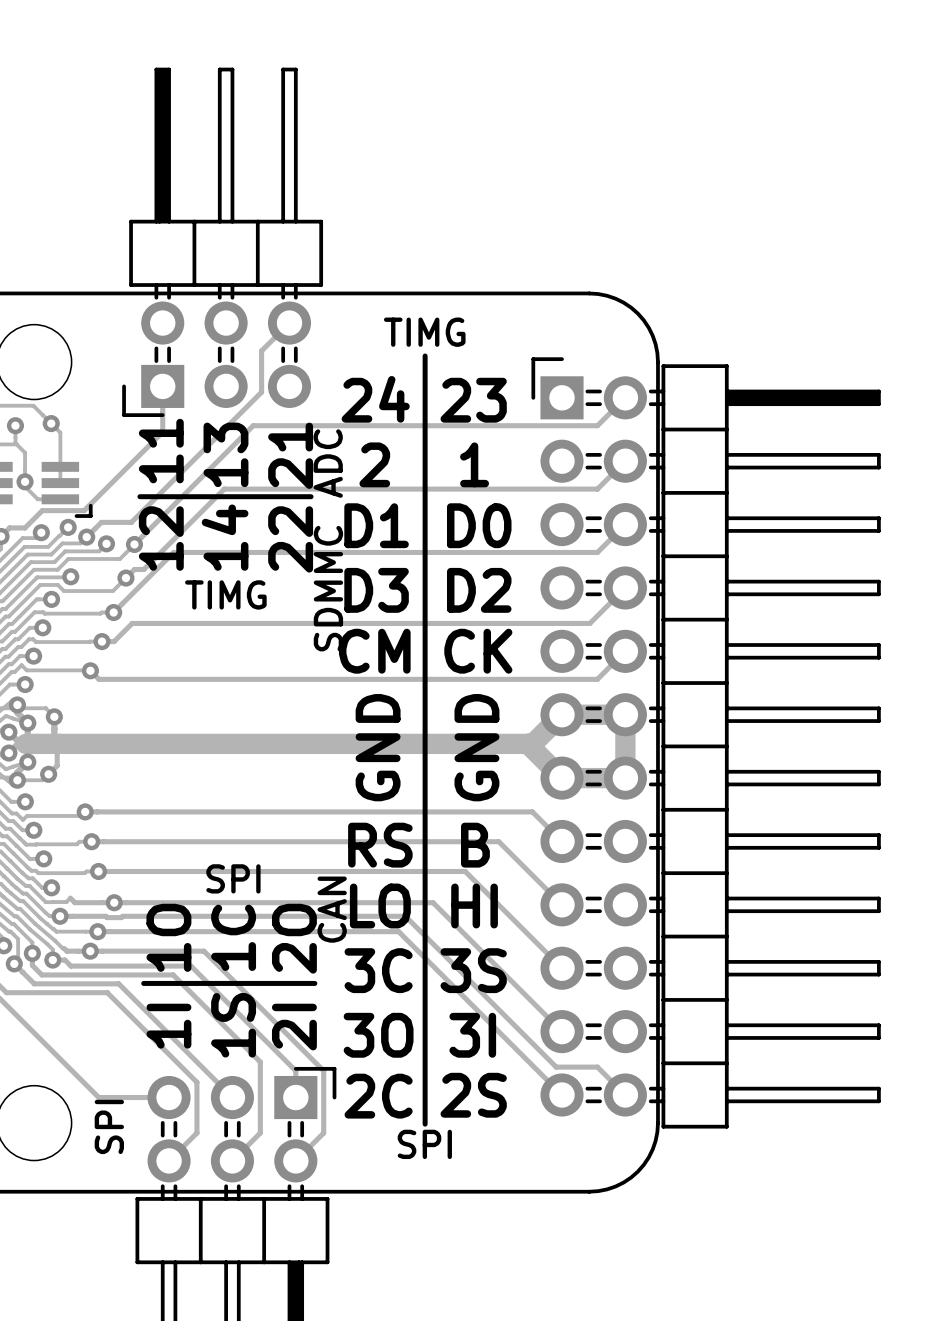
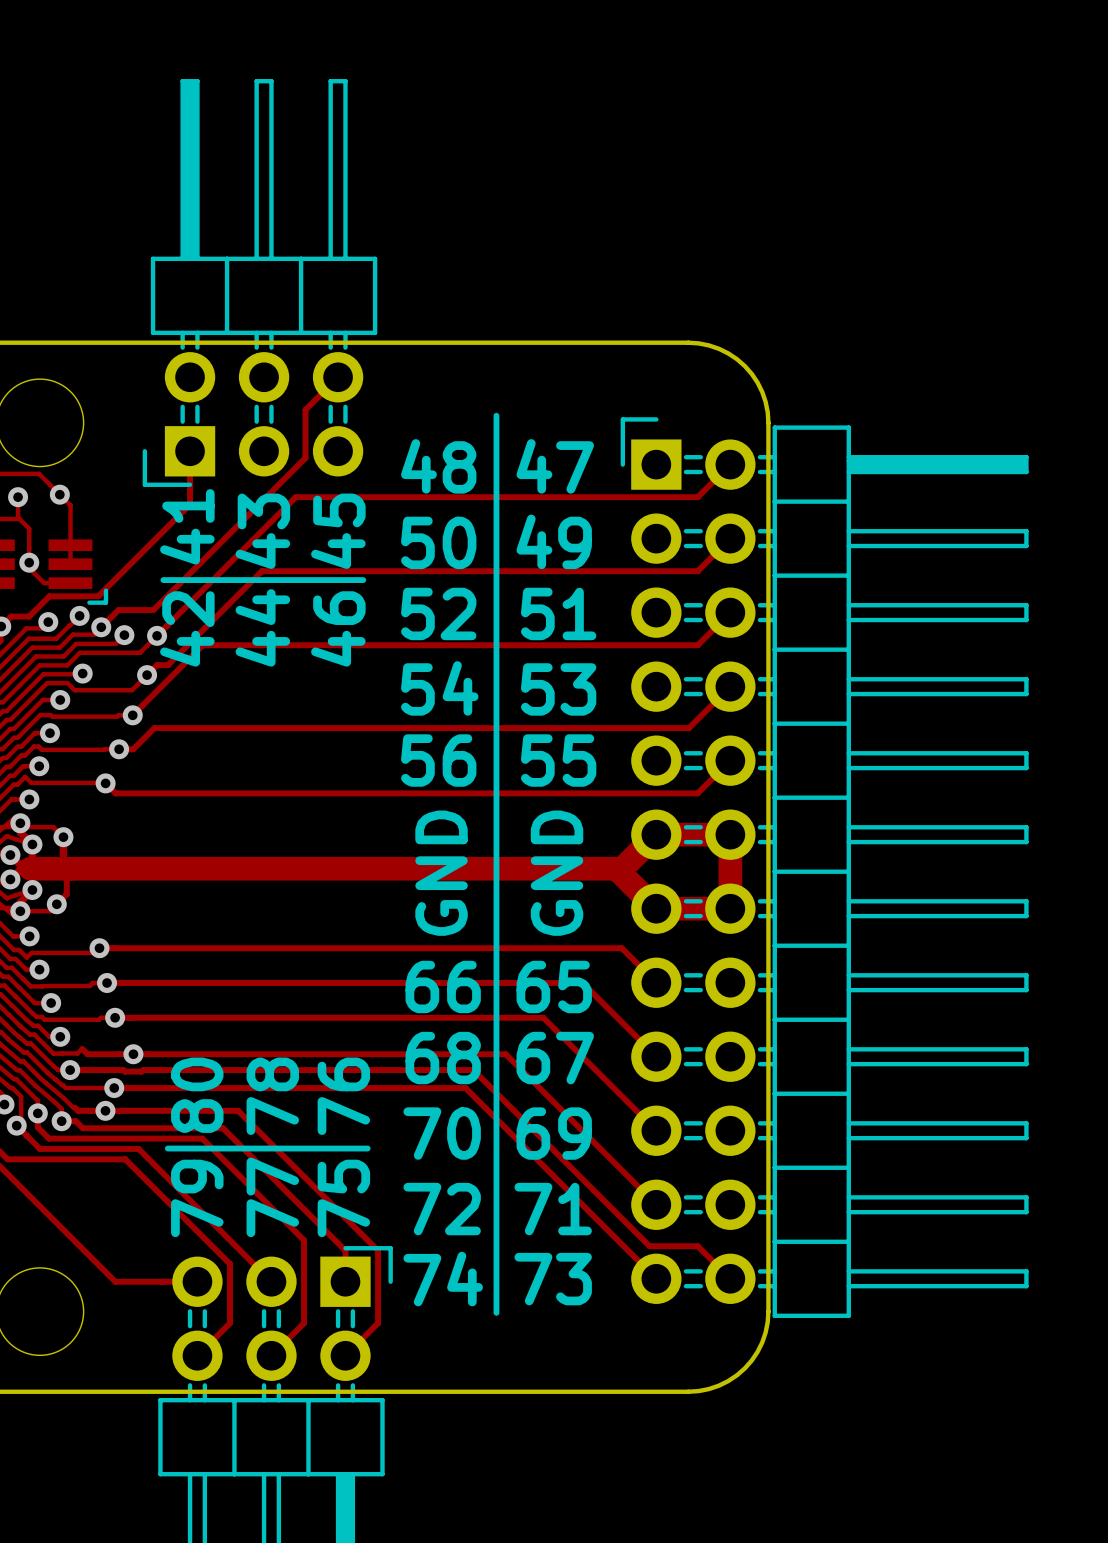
text: TIMG (424, 332) -> none
text: 24 (375, 399) -> 48 (438, 466)
text: 23 (473, 400) -> 47 (555, 466)
text: 11 (161, 451) -> 41 (187, 526)
text: 13 (225, 454) -> 43 (262, 531)
text: 21 (290, 455) -> 45 (338, 531)
text: ADC (328, 463) -> none
text: 2 (374, 464) -> 50 (438, 542)
text: 1 (474, 464) -> 49 (554, 541)
text: D1 (376, 525) -> 52 (438, 613)
text: D0 (479, 525) -> 51 (558, 613)
text: 14 (225, 537) -> 44 (262, 627)
text: 12 (161, 538) -> 42 (187, 628)
text: 22 (290, 539) -> 46 (338, 628)
text: SDMMC (328, 588) -> none
text: D3 (376, 590) -> 54 (439, 688)
text: D2 (479, 590) -> 53 (558, 689)
text: TIMG (225, 594) -> none
text: CM (374, 651) -> 56 (438, 760)
text: CK (478, 651) -> 55 (558, 760)
text: RS (380, 845) -> 66 (443, 987)
text: B (475, 845) -> 65 (554, 987)
text: SPI (233, 878) -> none
text: LO (380, 905) -> 68 (443, 1058)
text: HI (474, 905) -> 67 (555, 1058)
text: CAN (332, 909) -> none
text: 1O (168, 937) -> 80 (197, 1095)
text: 1C (233, 937) -> 78 (272, 1096)
text: 2O (294, 938) -> 76 (343, 1096)
text: 3C (378, 970) -> 70 (442, 1133)
text: 3S (473, 970) -> 69 (554, 1133)
text: 1S (233, 1025) -> 77 (272, 1197)
text: 1I (168, 1026) -> 79 (197, 1198)
text: 2I (294, 1027) -> 75 (343, 1198)
text: 3O (378, 1035) -> 72 (442, 1209)
text: 3I (472, 1035) -> 71 (553, 1209)
text: 2S (473, 1095) -> 73 (553, 1279)
text: 2C (378, 1096) -> 74 (443, 1279)
text: SPI (109, 1126) -> none
text: SPI (424, 1144) -> none

